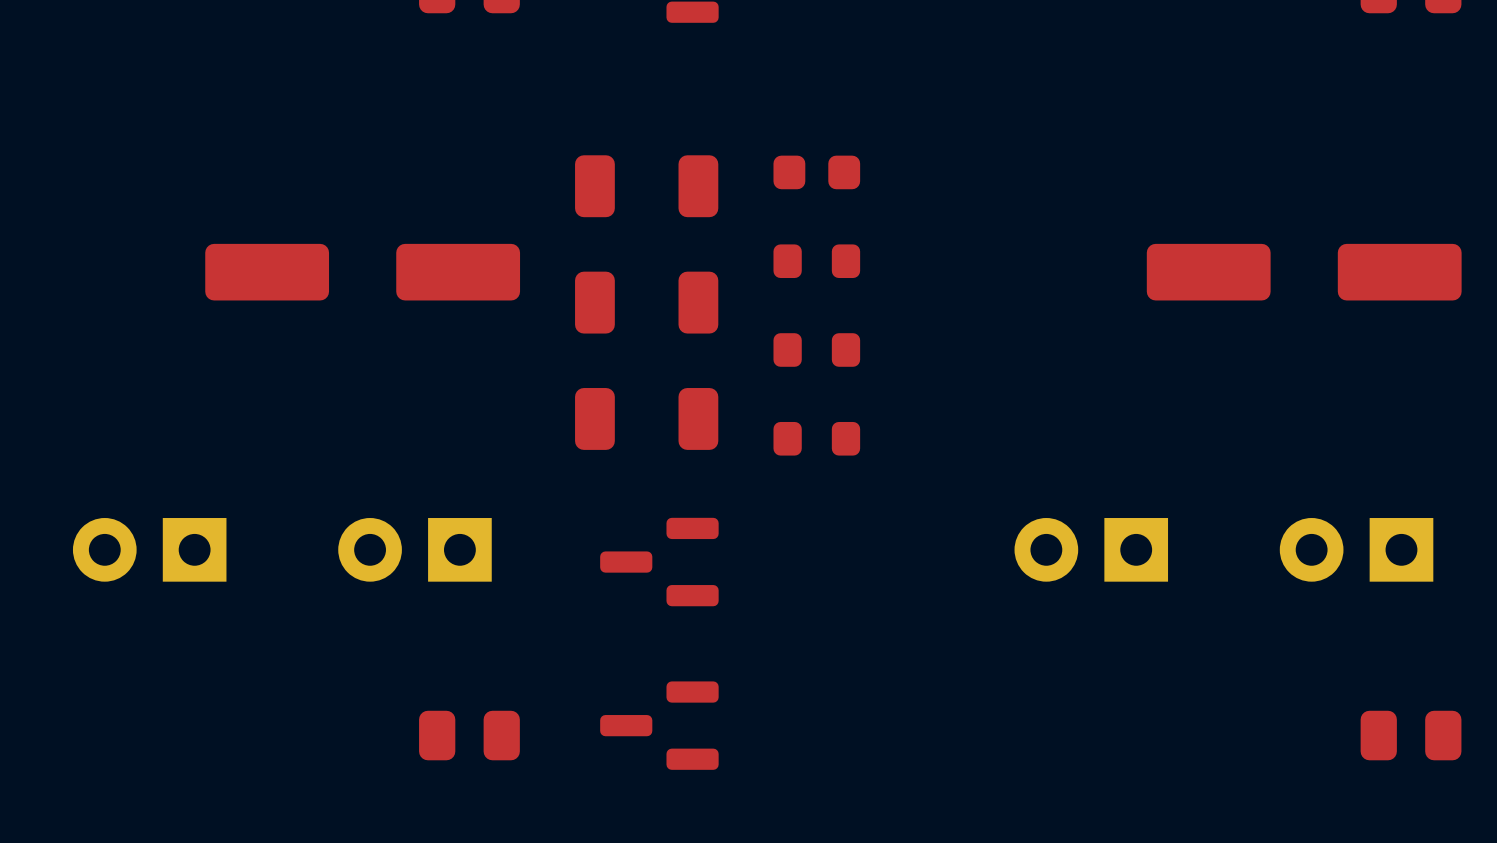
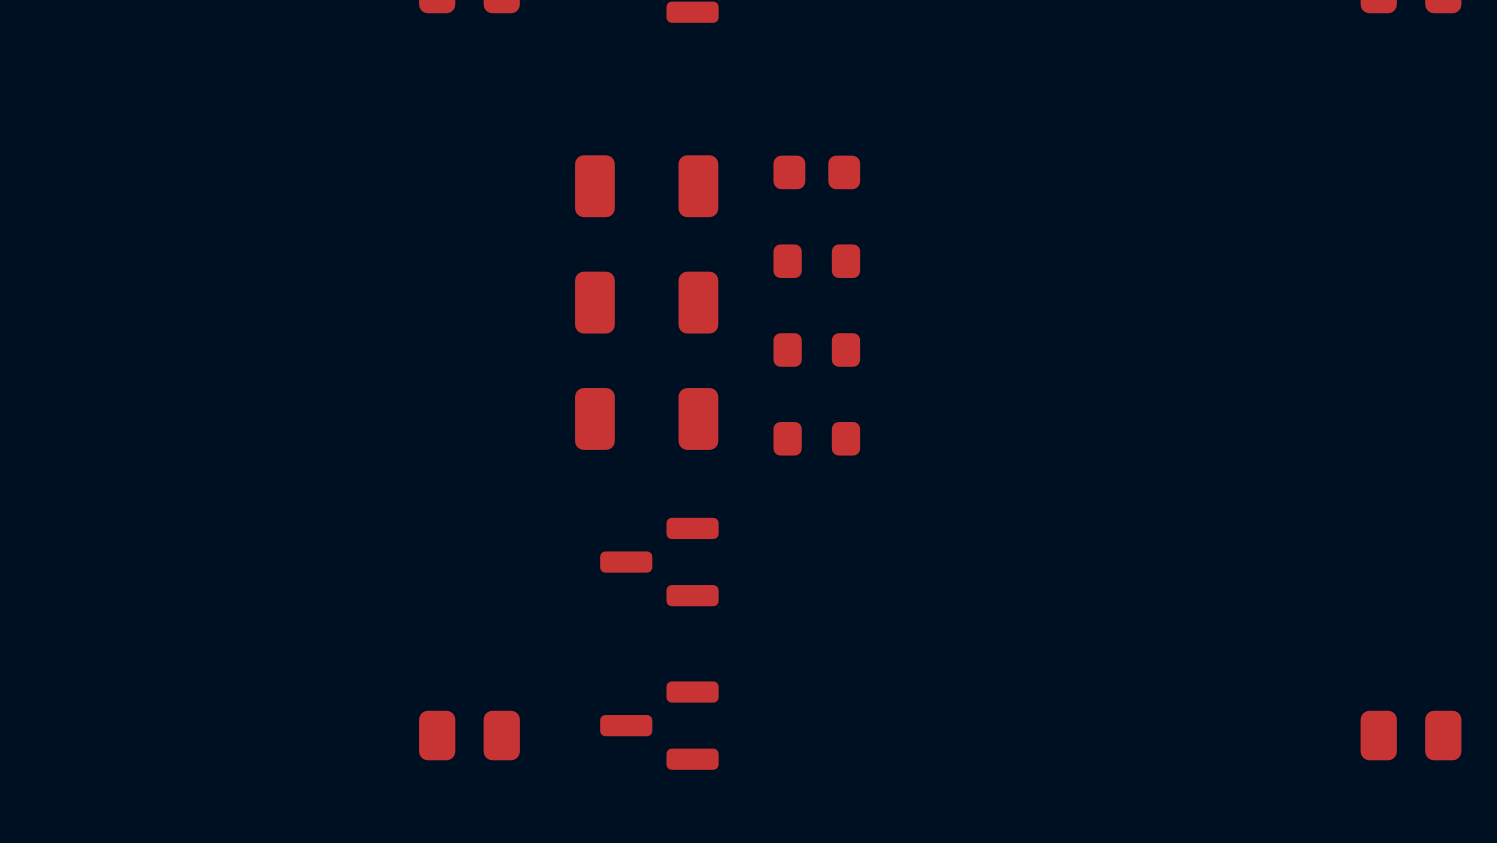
part: (362, 272) -> none
part: (1304, 272) -> none
part: (149, 549) -> none
part: (414, 549) -> none
part: (1091, 549) -> none
part: (1356, 549) -> none

